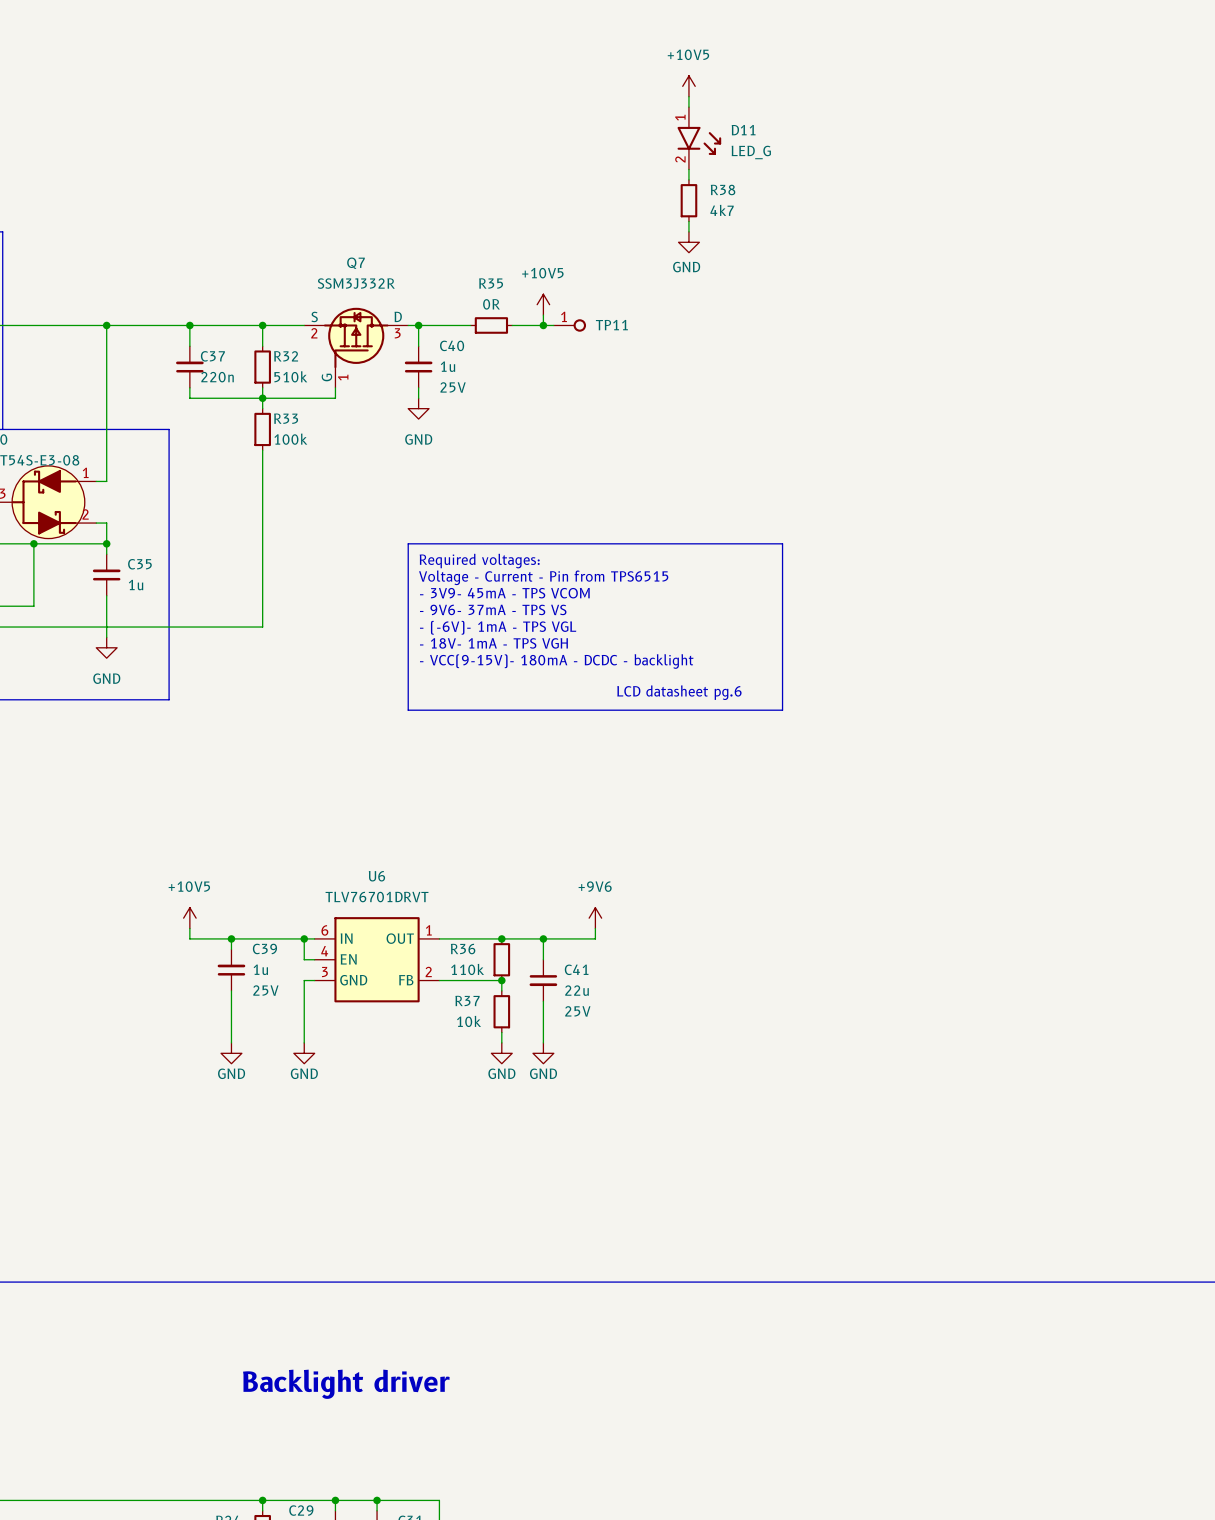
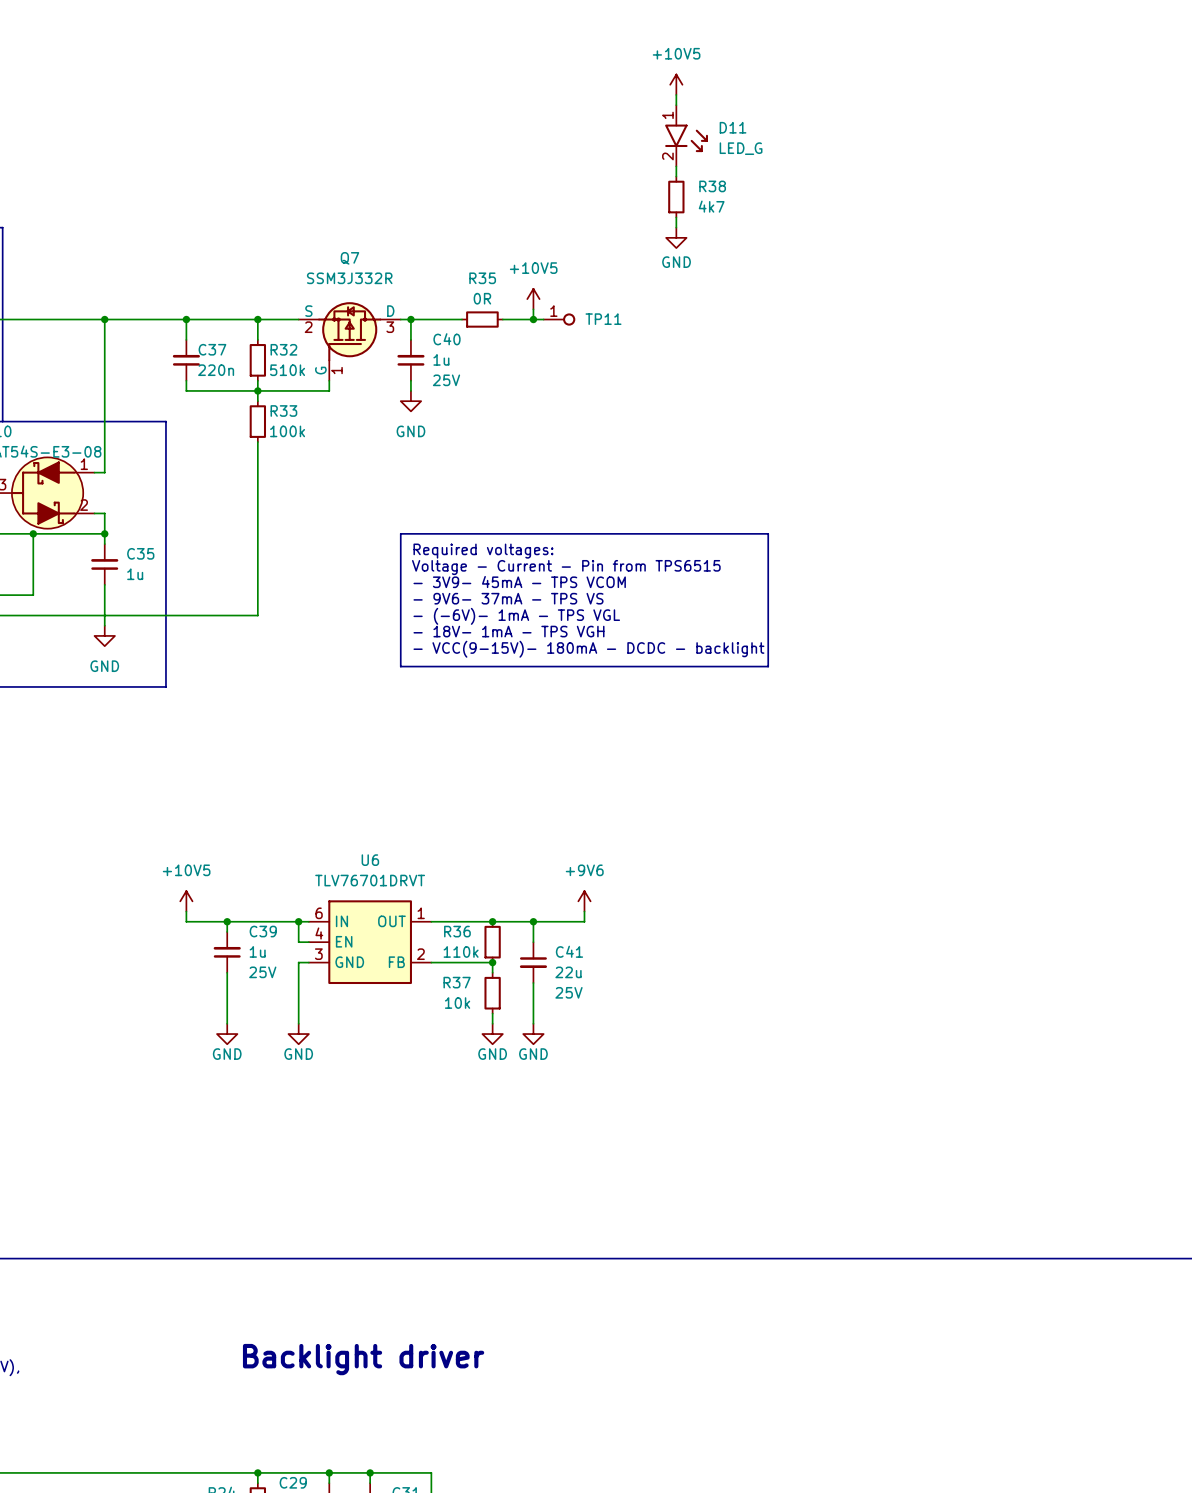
line: (408, 679) (408, 710) (782, 710) (782, 679) -> (400, 666) (768, 666)
text: LCD datasheet pg.6 (679, 692) -> none

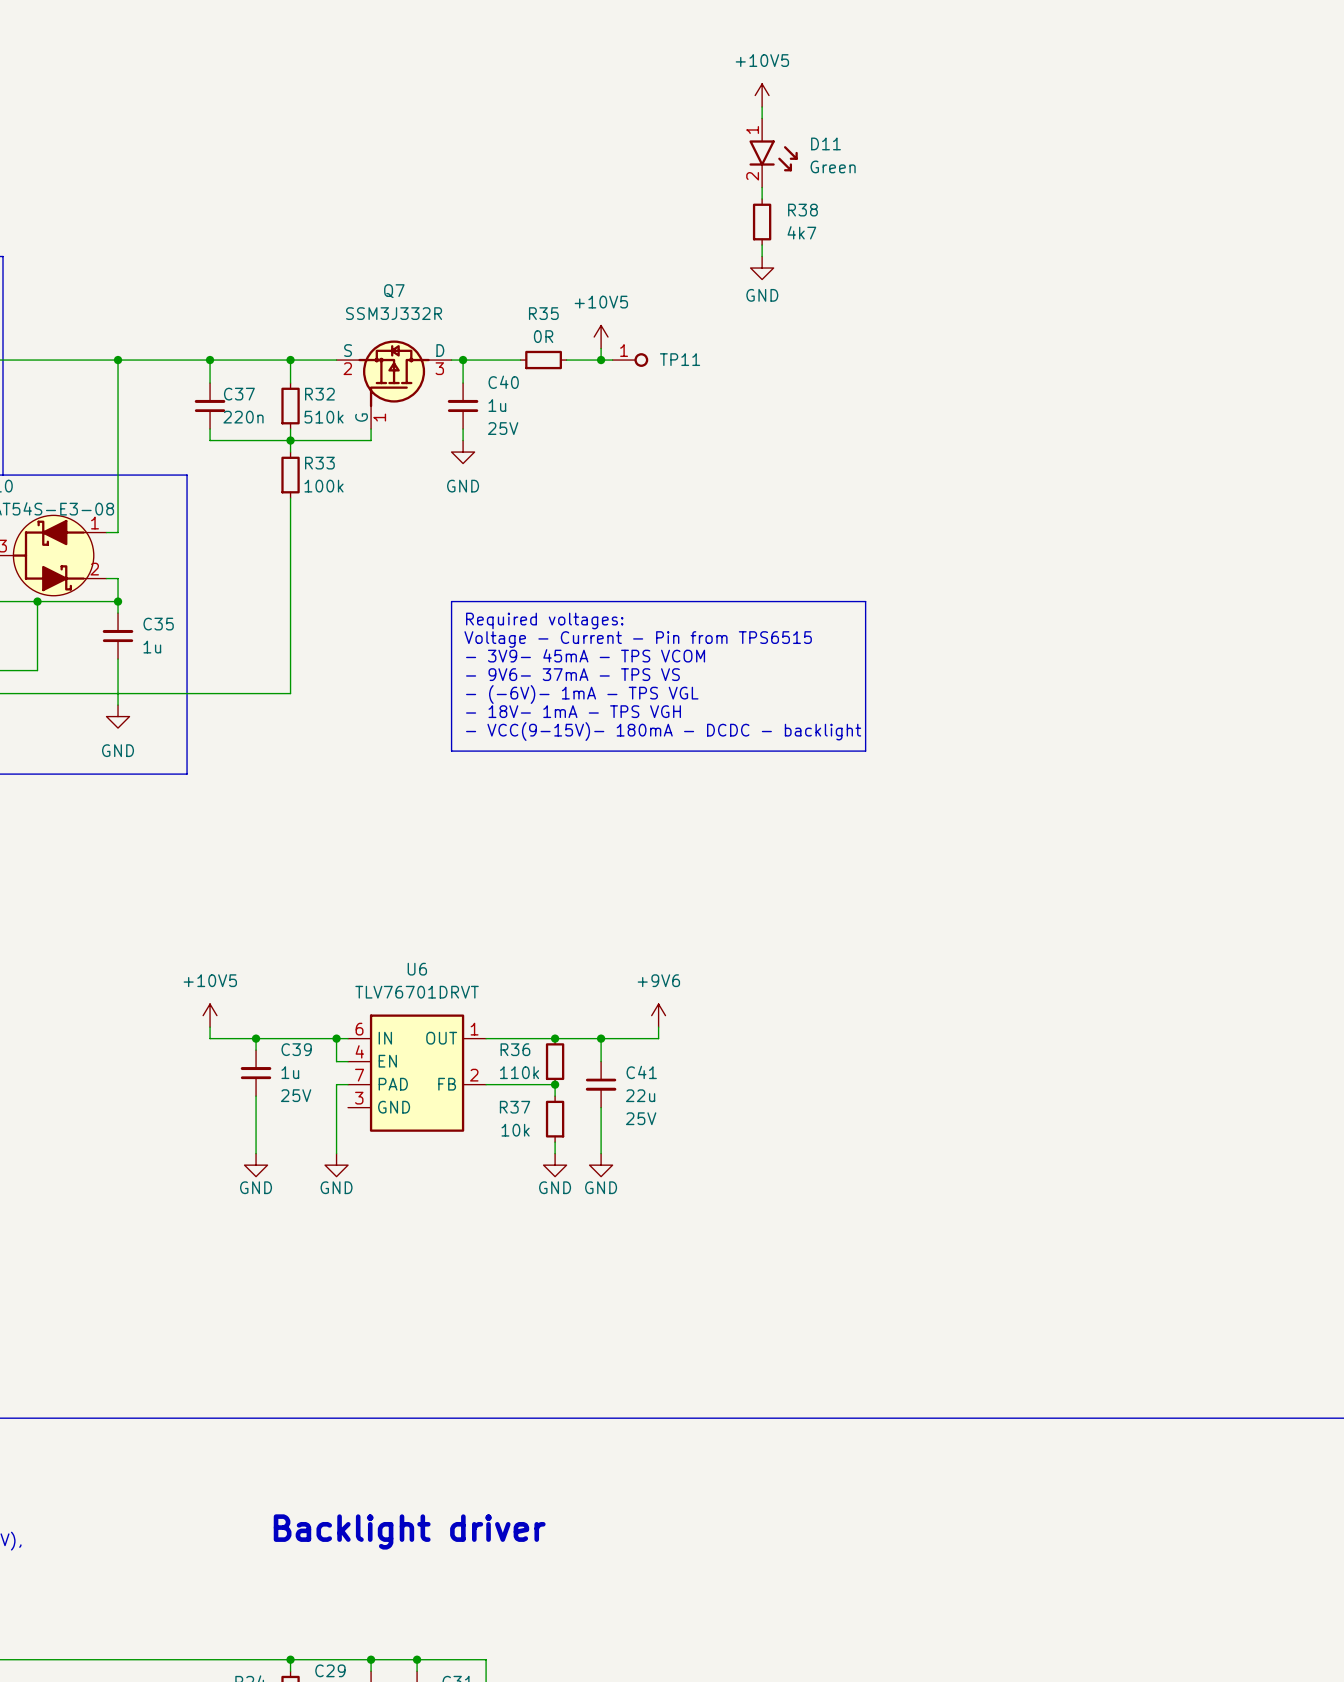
D11 text: none -> Green (833, 166)
D11 value: LED_G (741, 148) -> none
U6 symbol: [308, 900, 432, 985] -> [348, 1014, 487, 1132]

